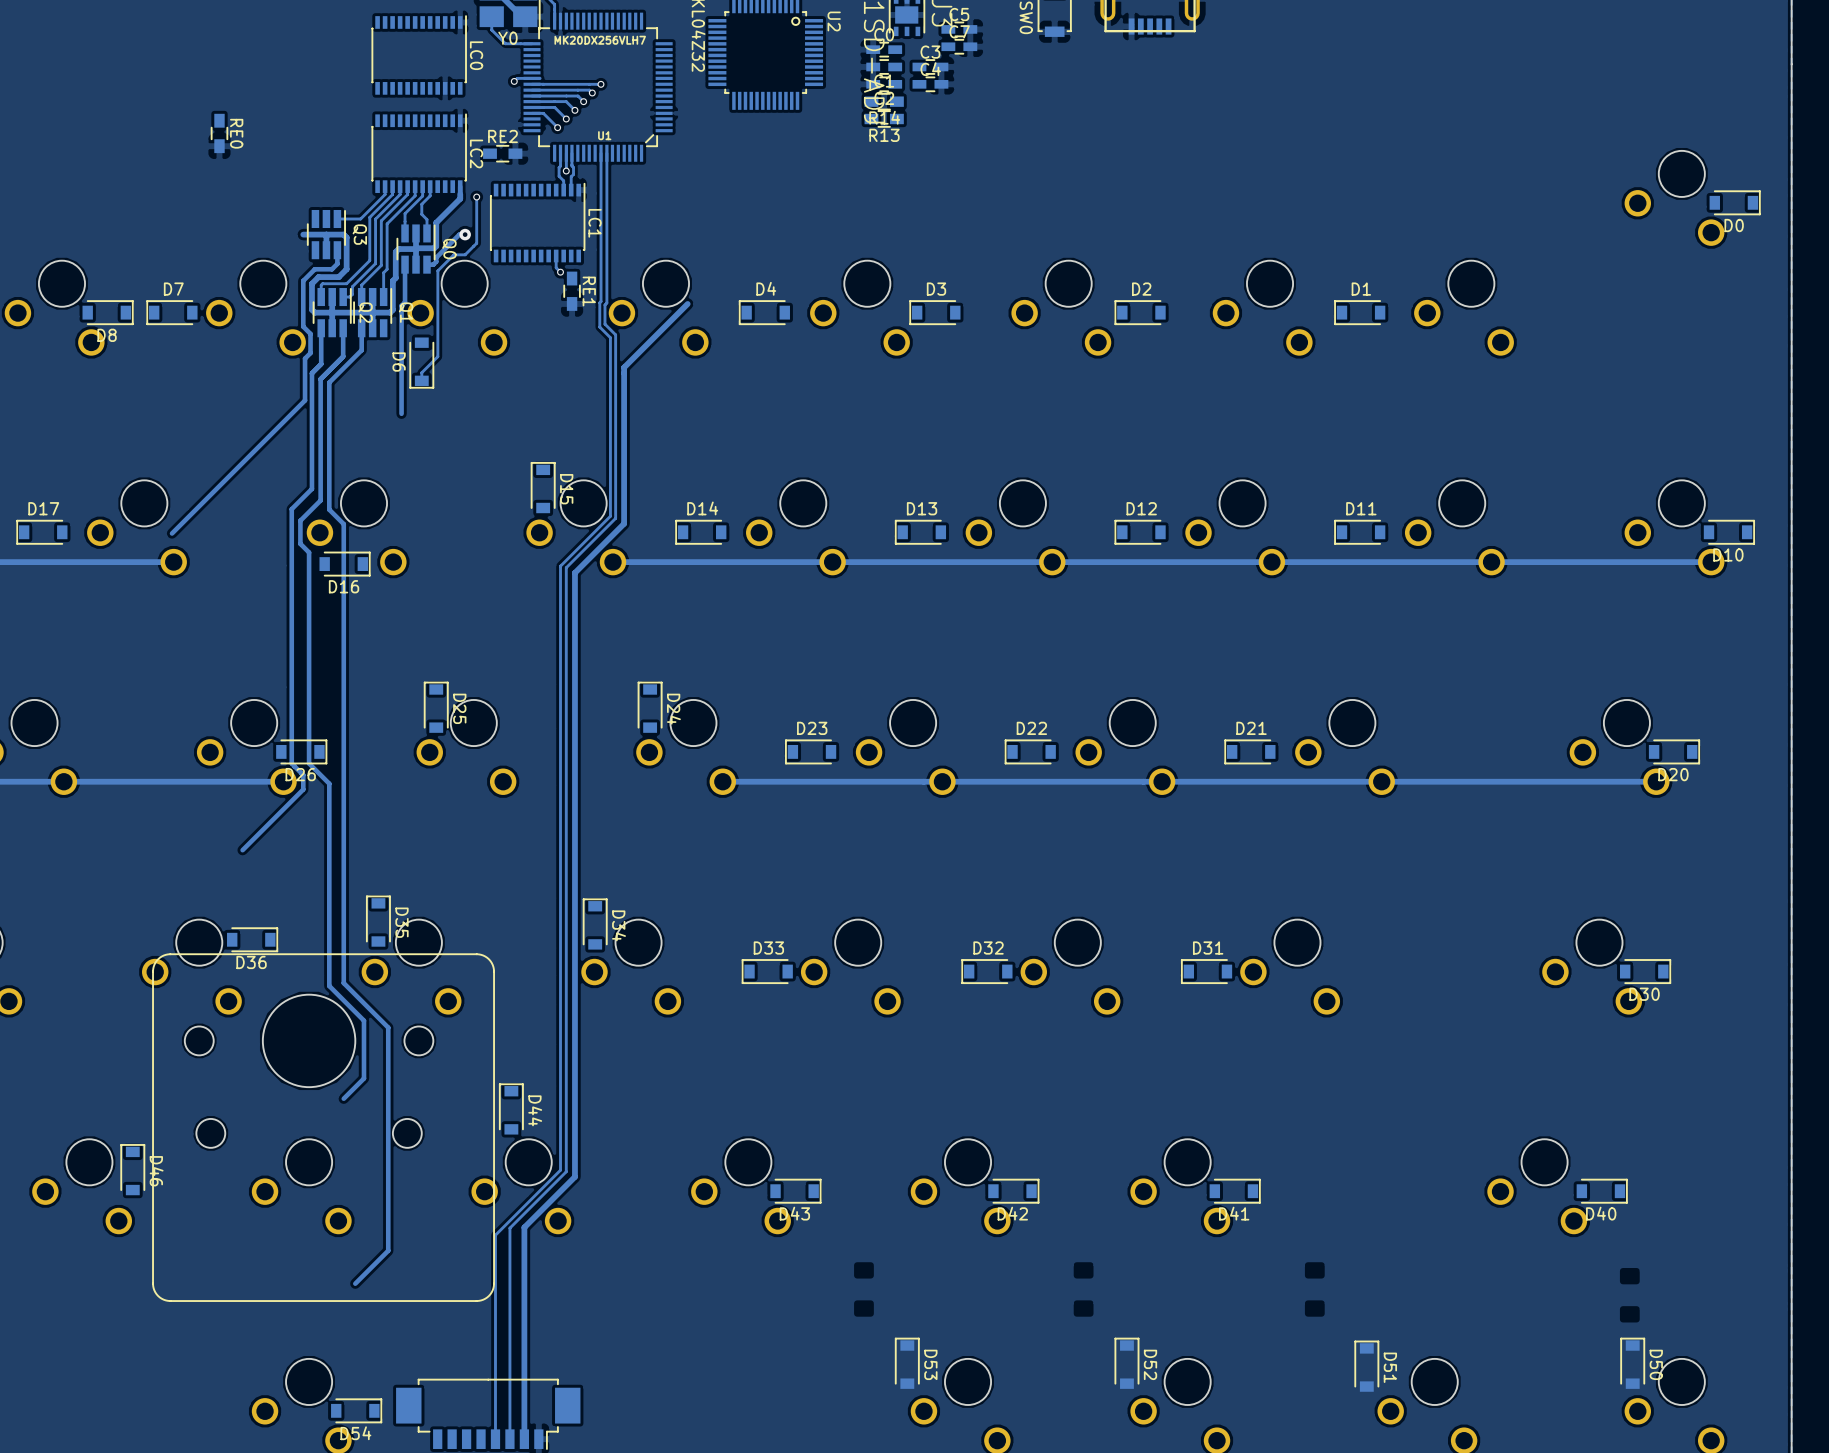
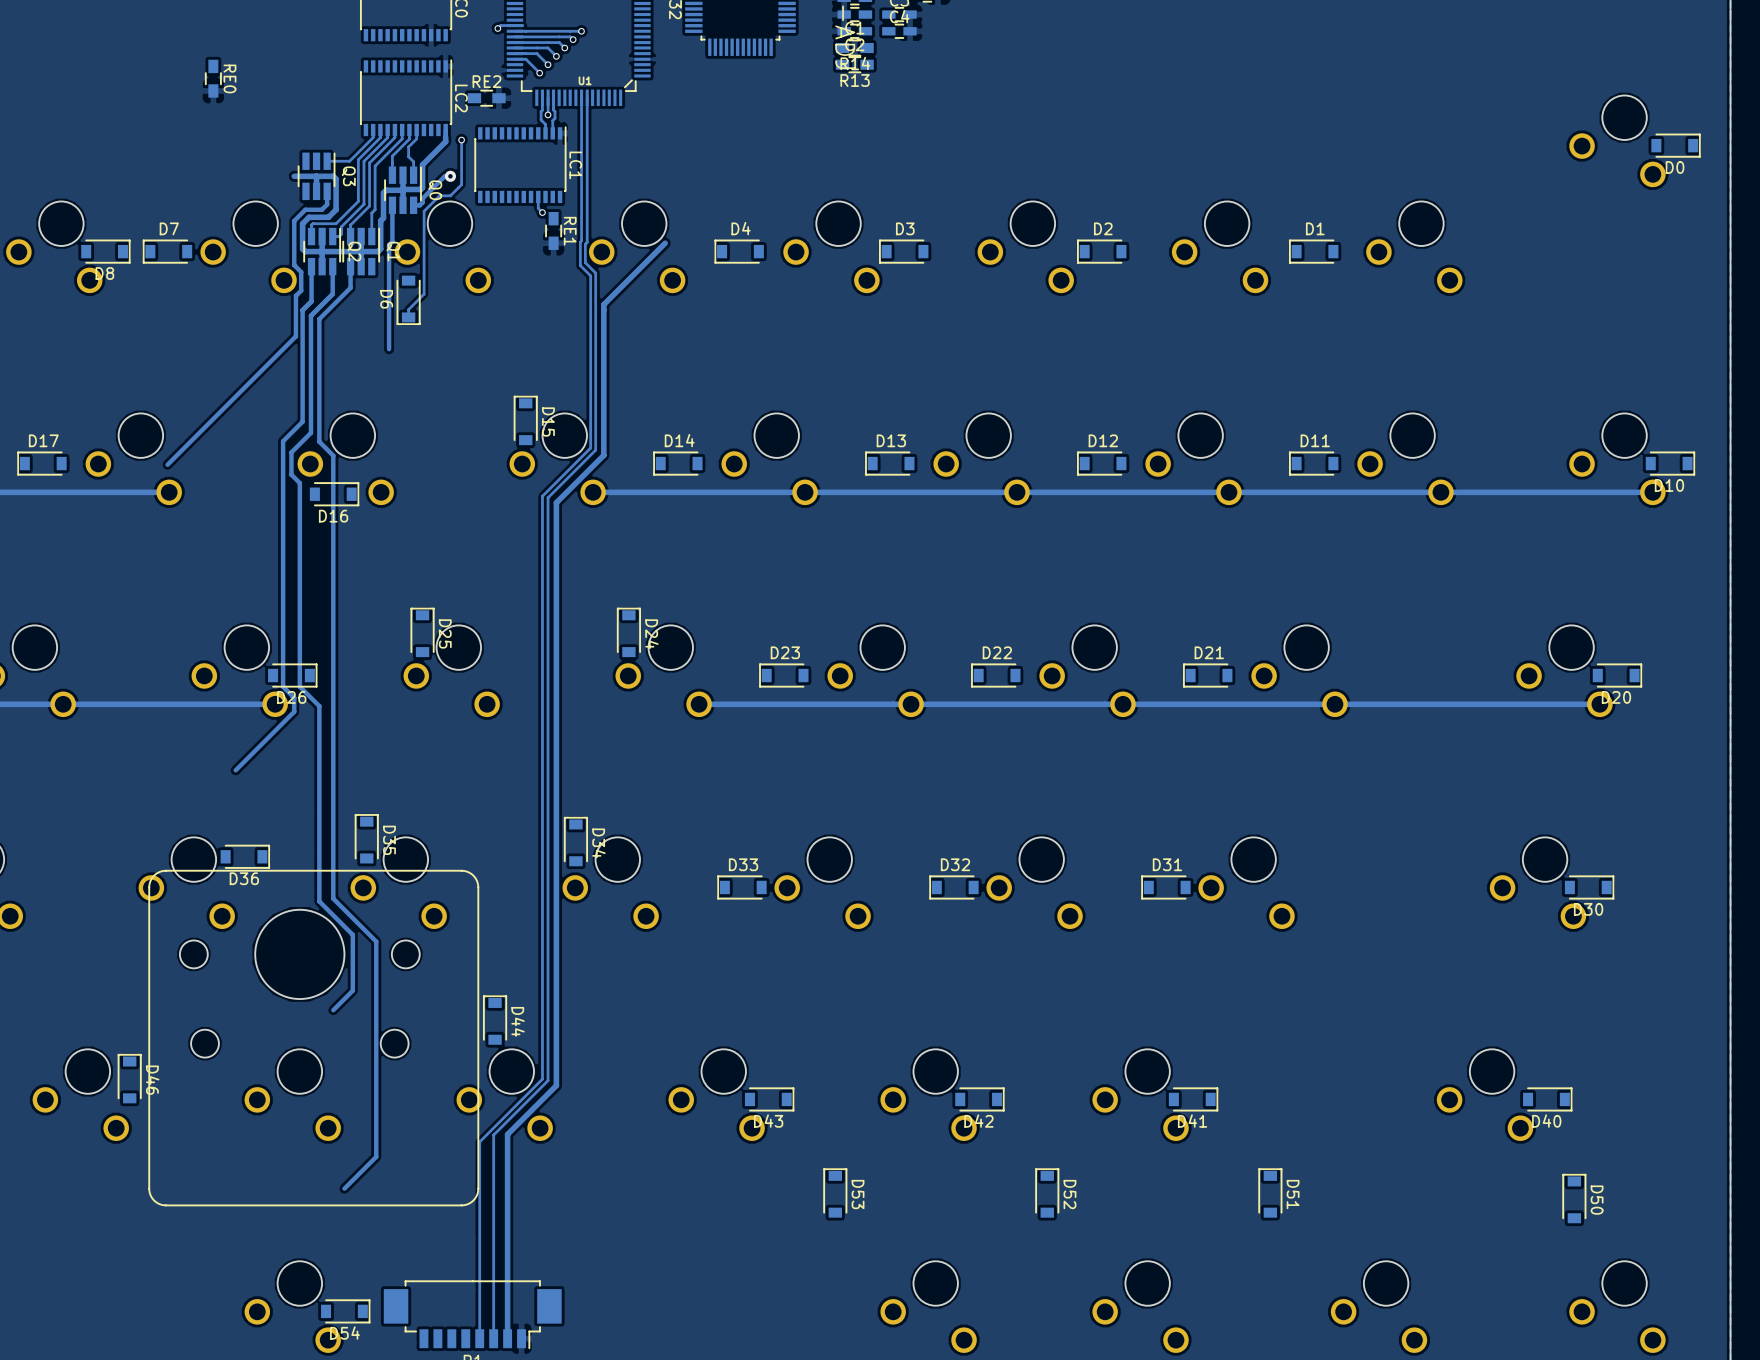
D53 position: (907, 1363) -> (835, 1193)
D52 position: (1126, 1363) -> (1047, 1193)
D50 position: (1632, 1363) -> (1574, 1198)
D51 position: (1366, 1366) -> (1270, 1193)

